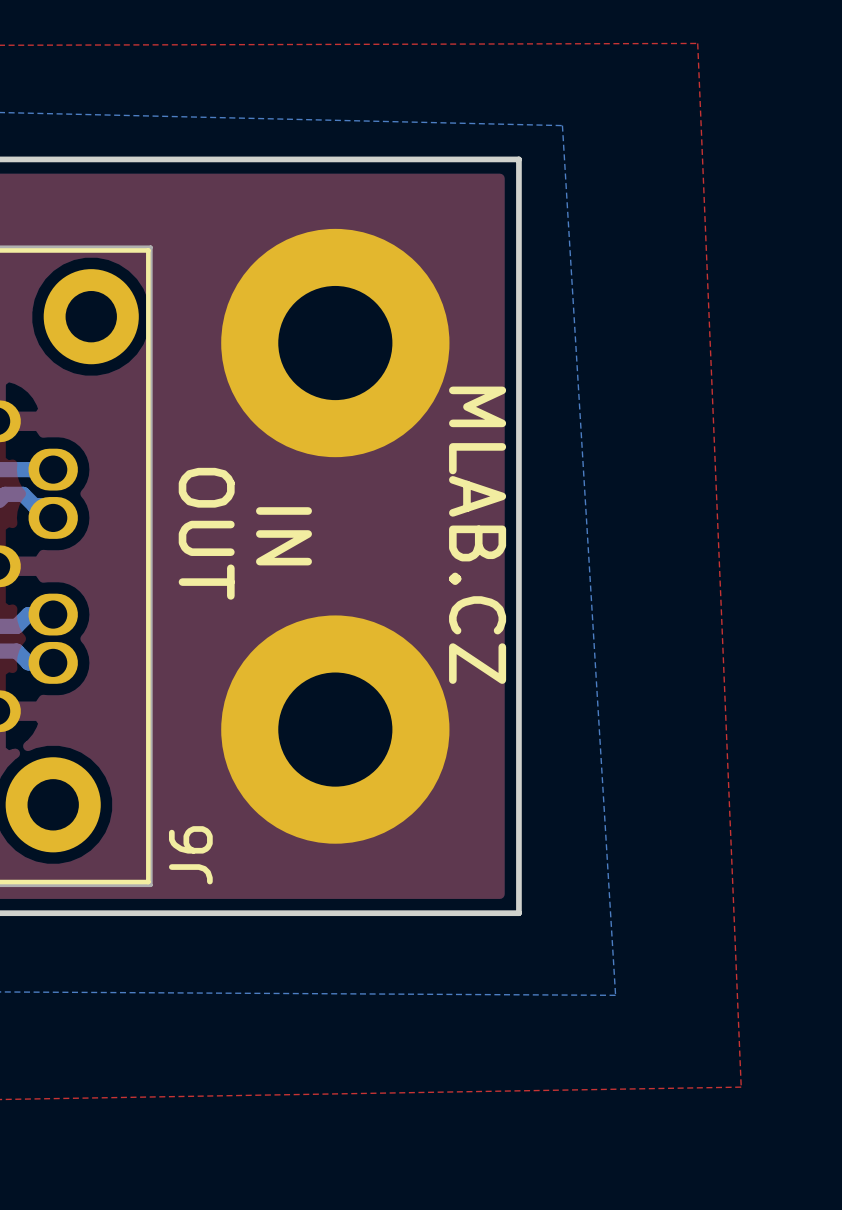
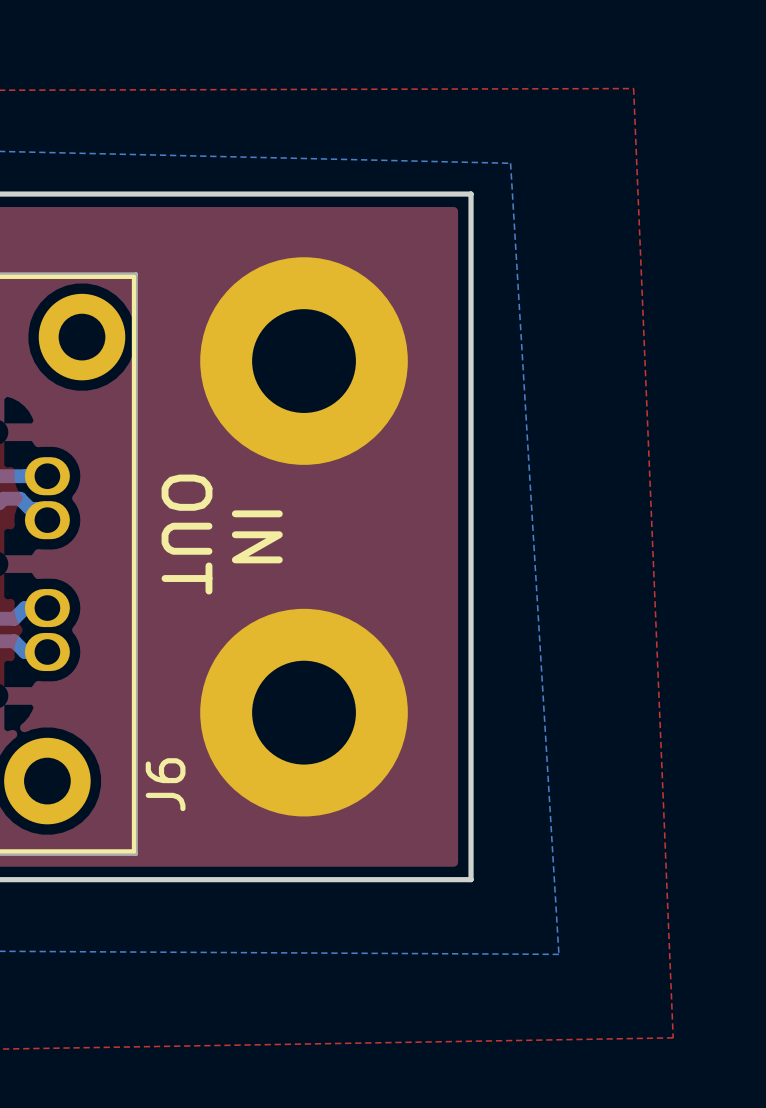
text: MLAB.CZ (477, 535) -> none
J6 name position: J6 (190, 855) -> J6 (165, 784)

